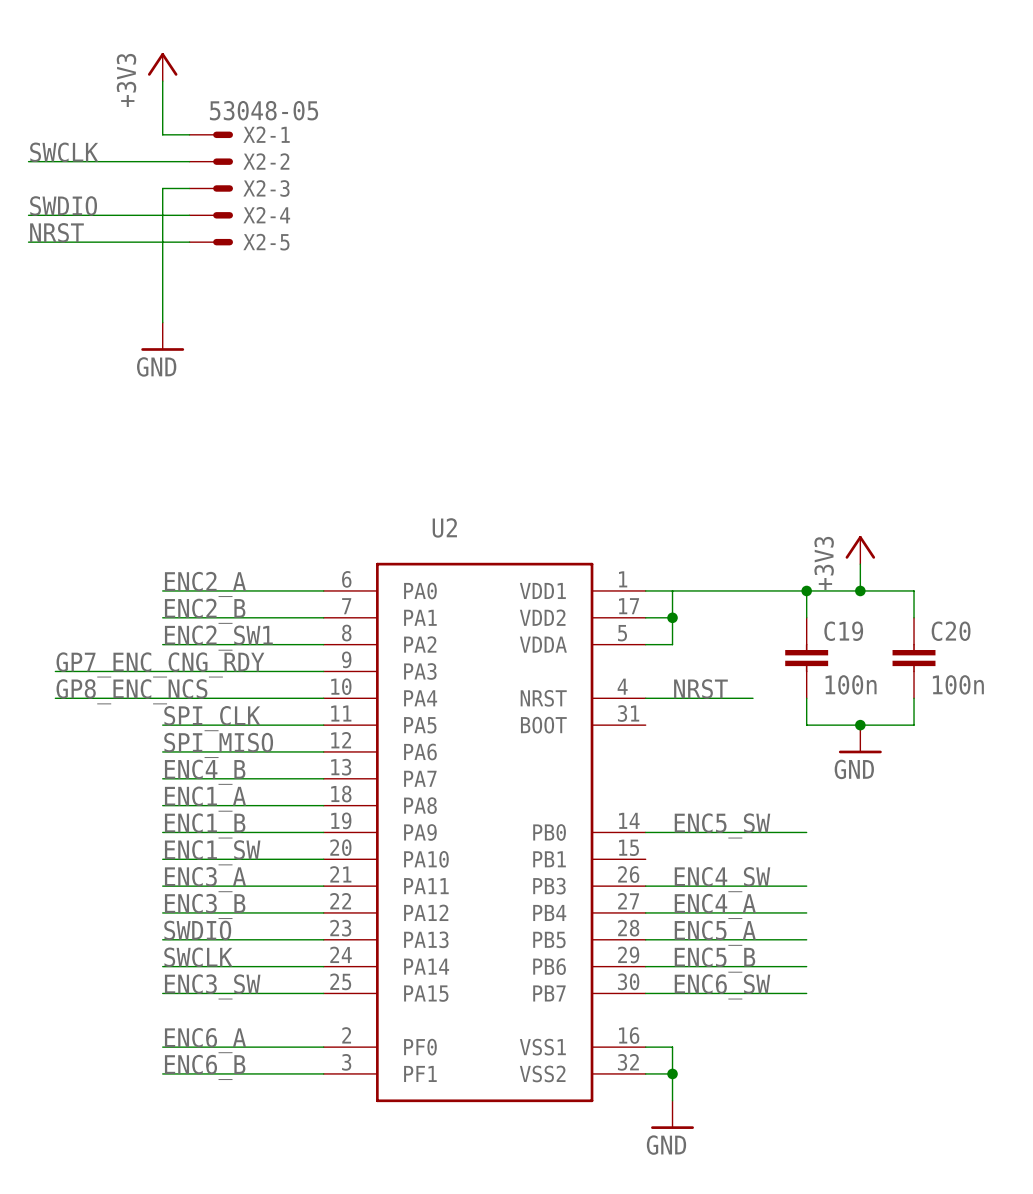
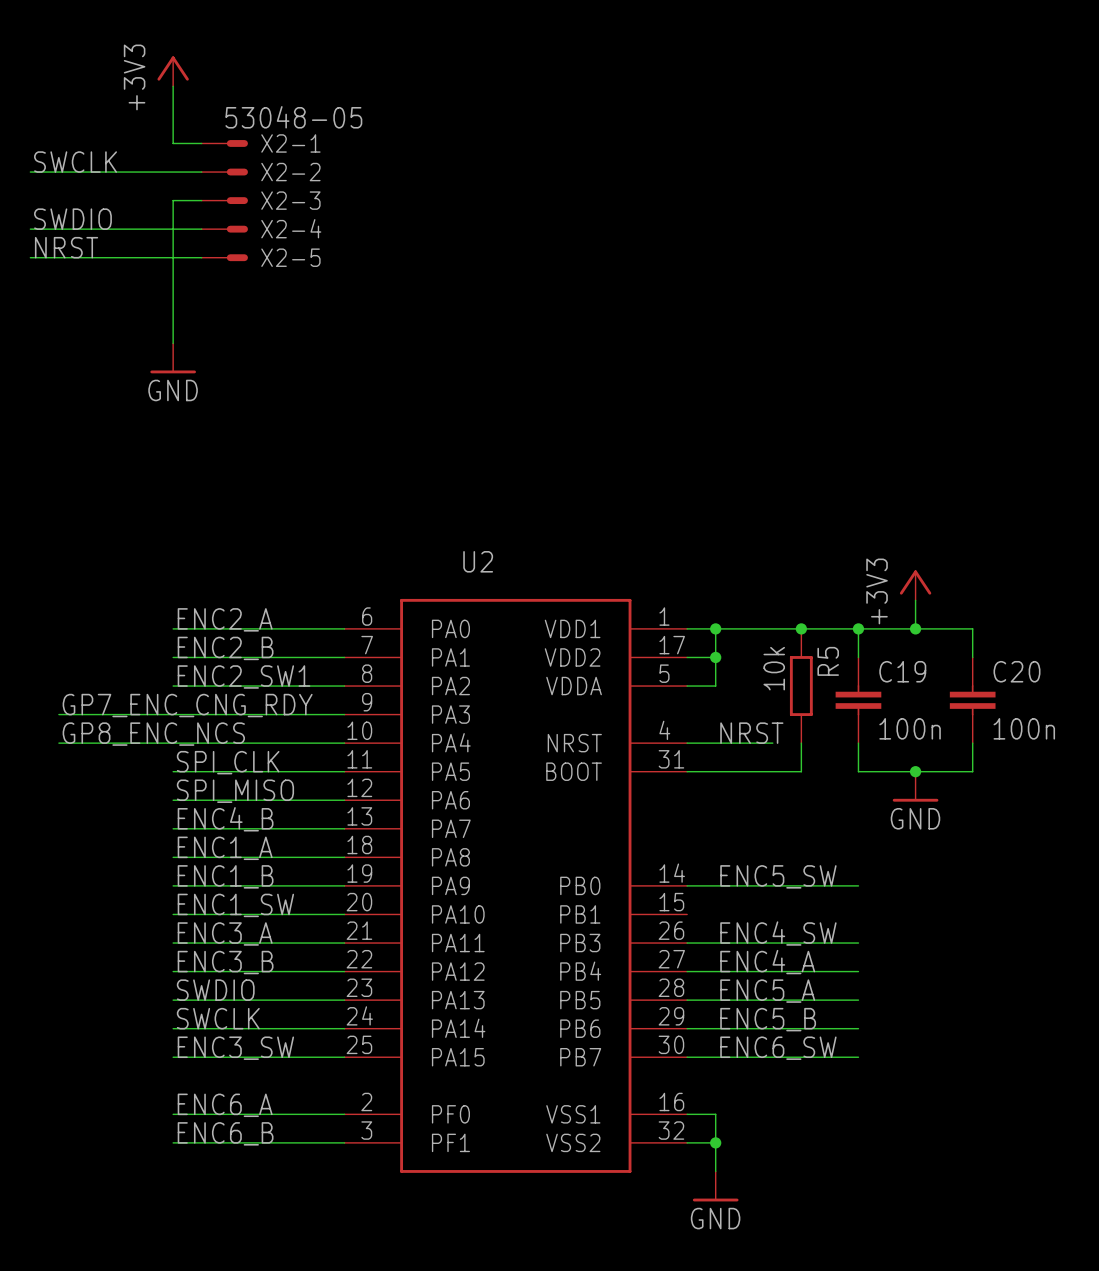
junction: none -> (715, 628)
junction: none -> (801, 628)
R5: none -> 10k (801, 686)
wire: (726, 698) (753, 698) -> (687, 771) (801, 771) (801, 743)

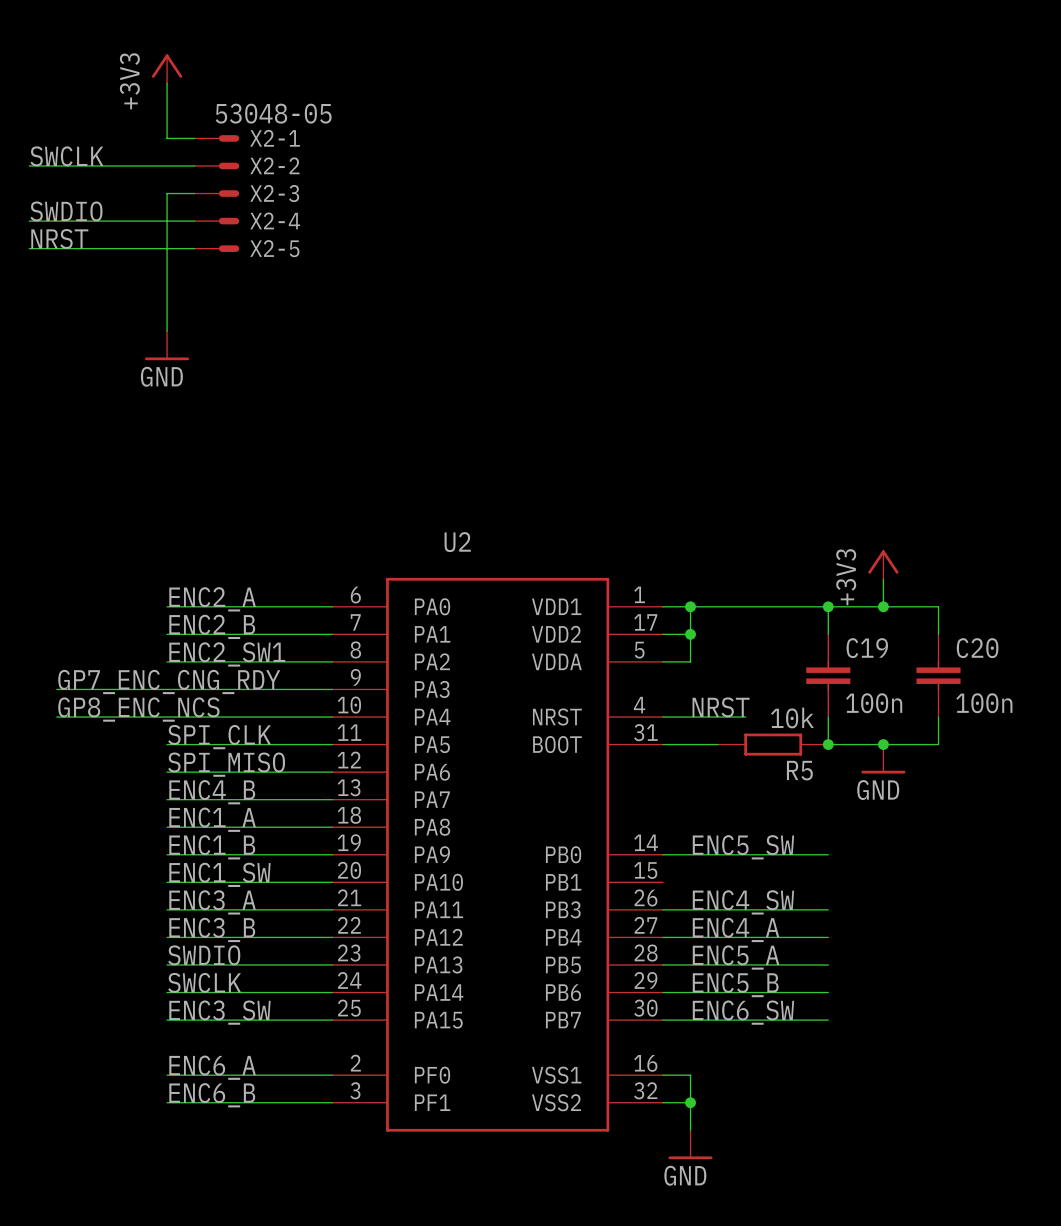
junction: (801, 628) -> none
R5 rotation: 0° (801, 686) -> 90° clockwise (773, 744)
R5 position: (801, 686) -> (773, 744)
wire: (801, 743) (801, 771) (744, 771) -> none
junction: none -> (828, 744)

